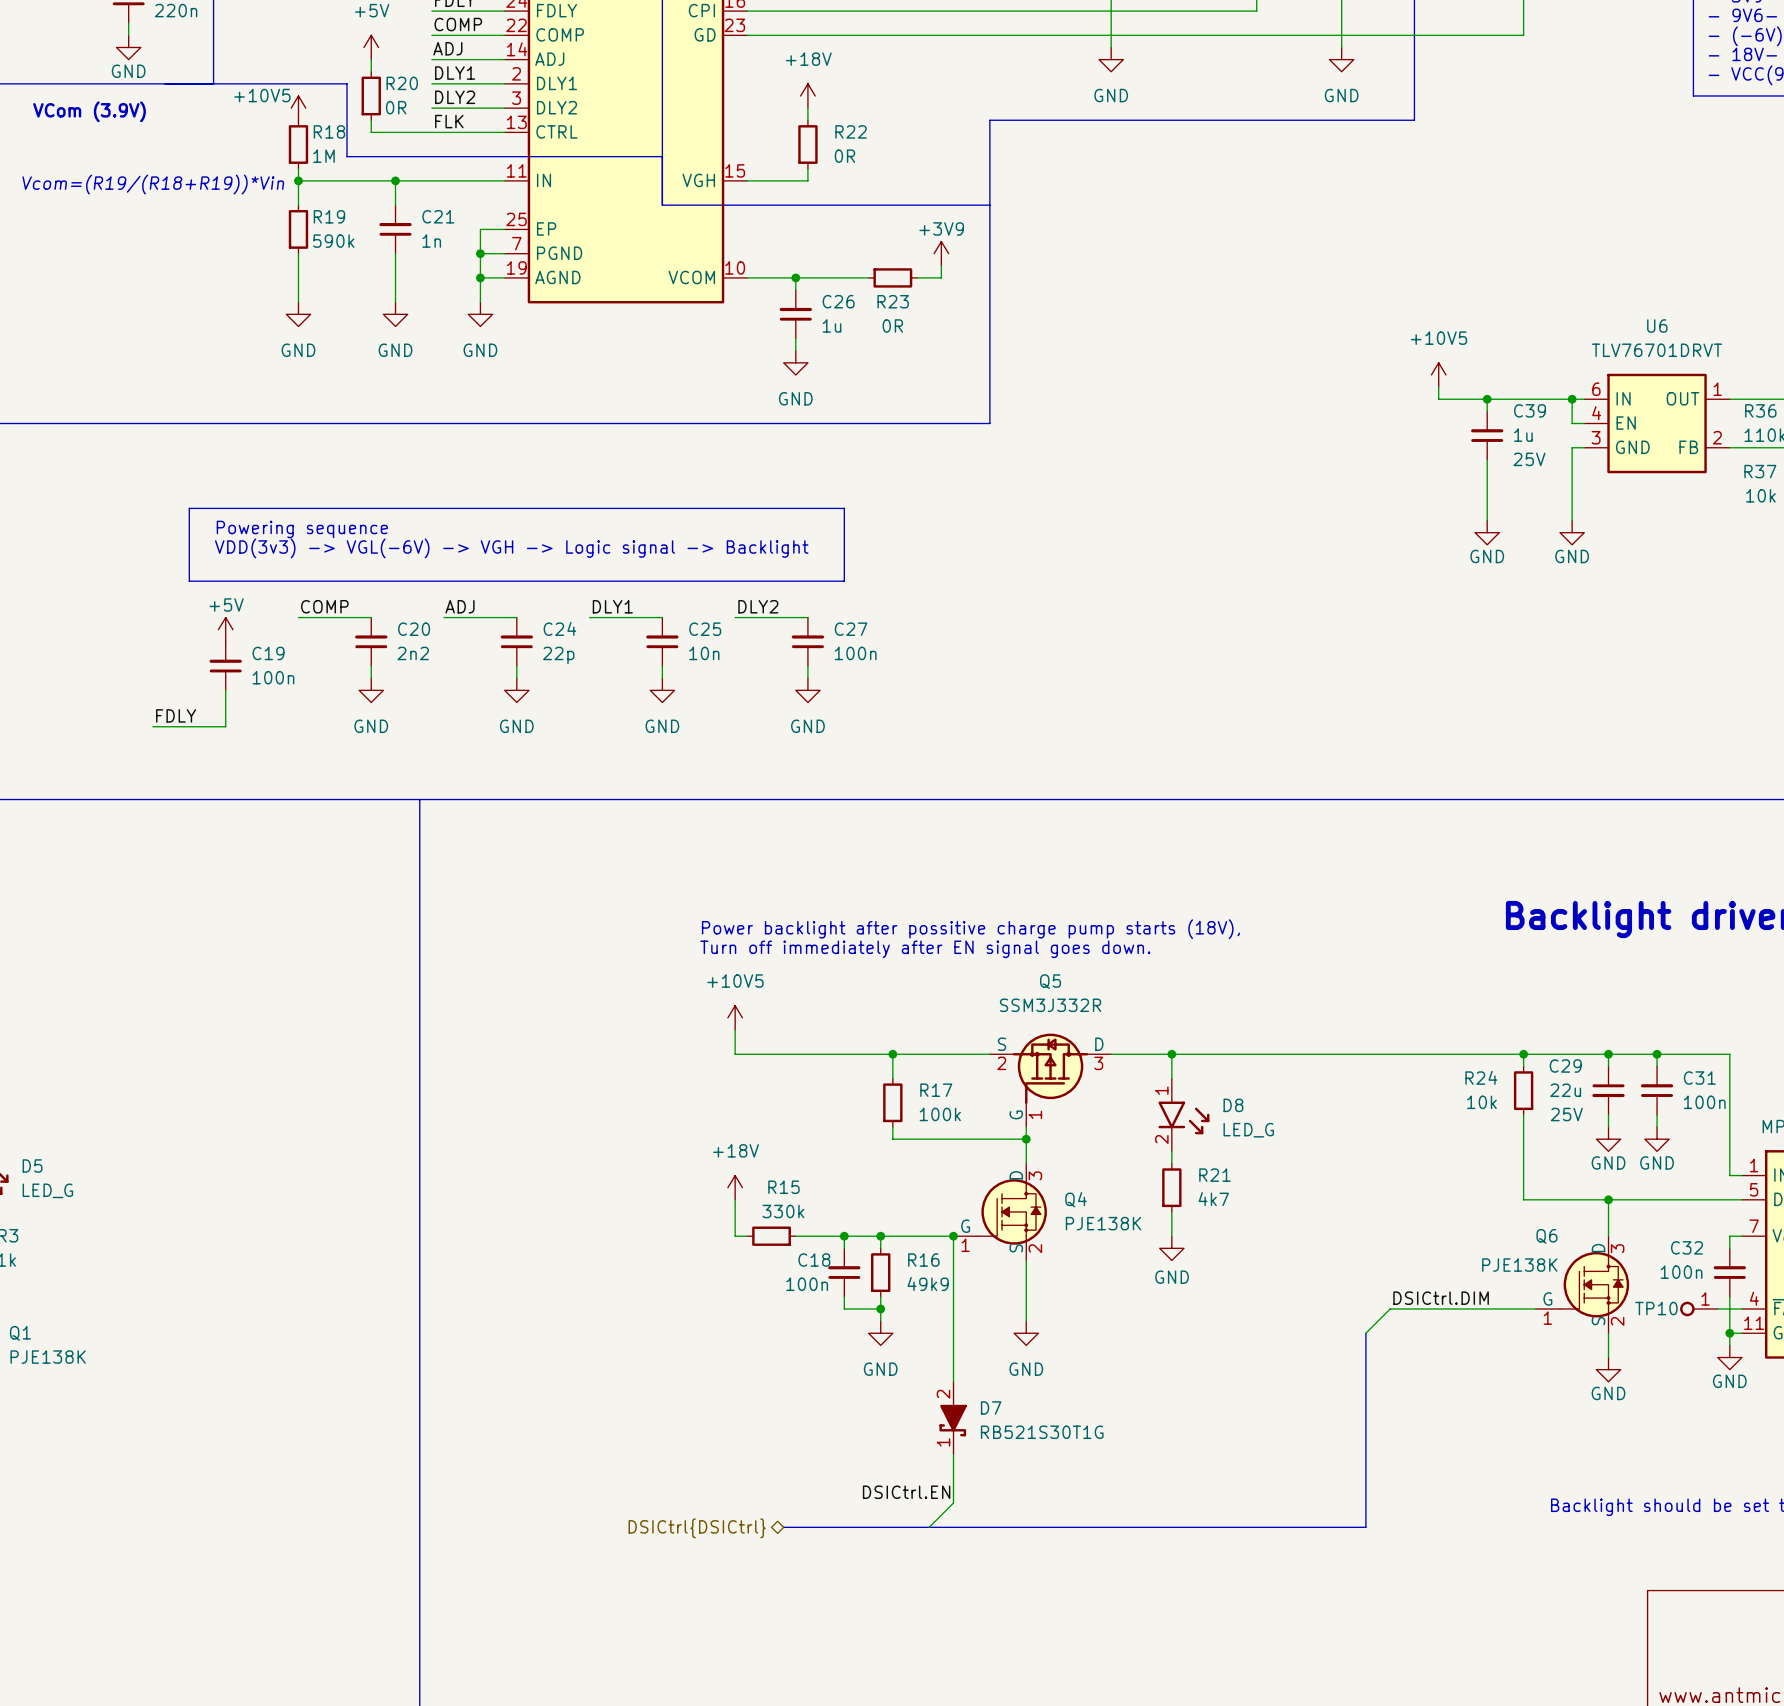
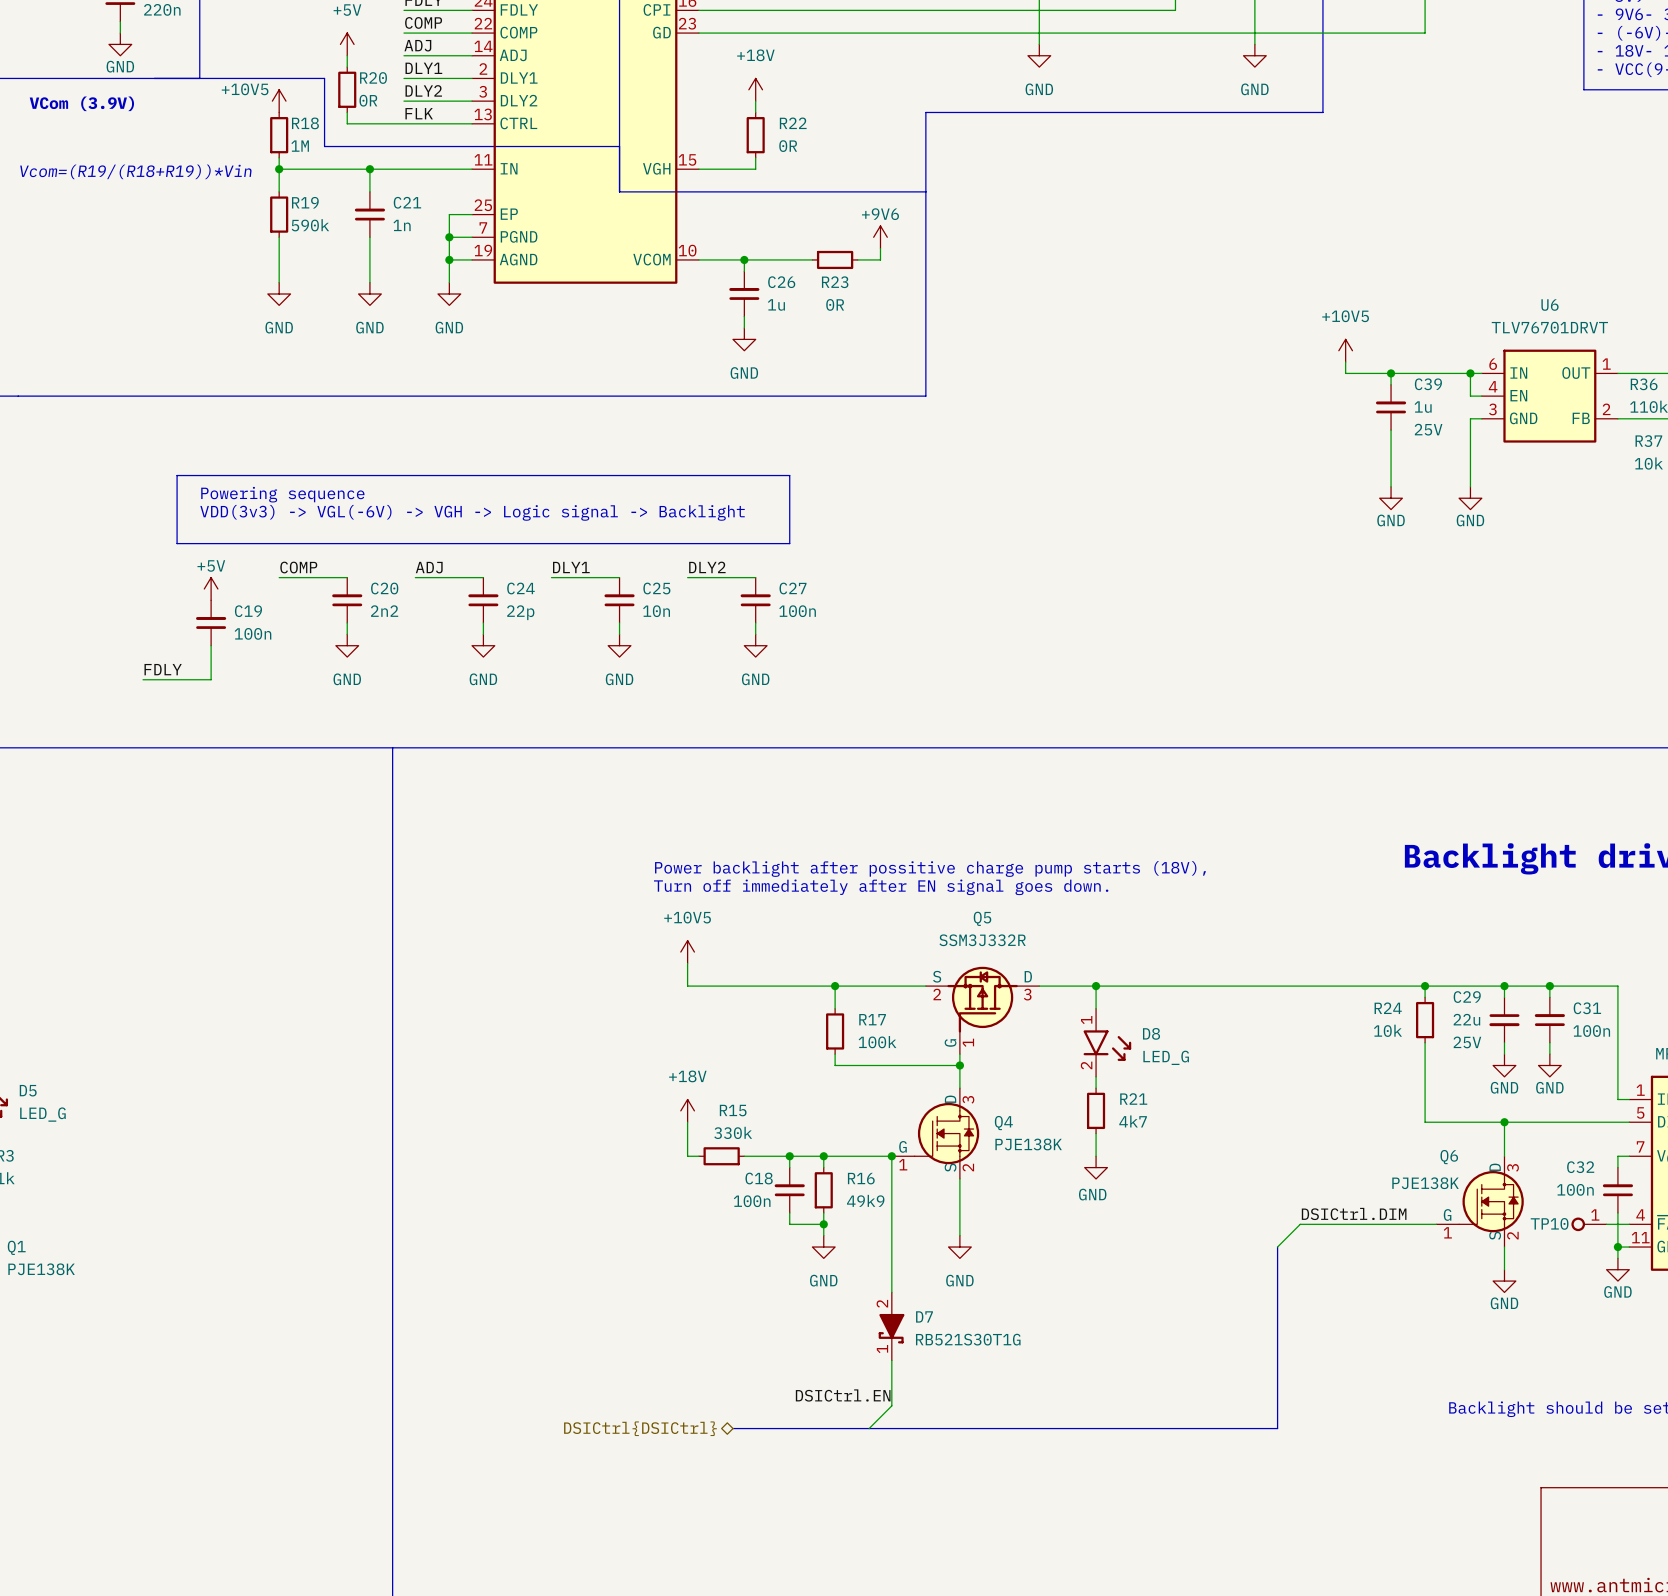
power symbol: +3V9 (941, 253) -> +9V6 (880, 237)

